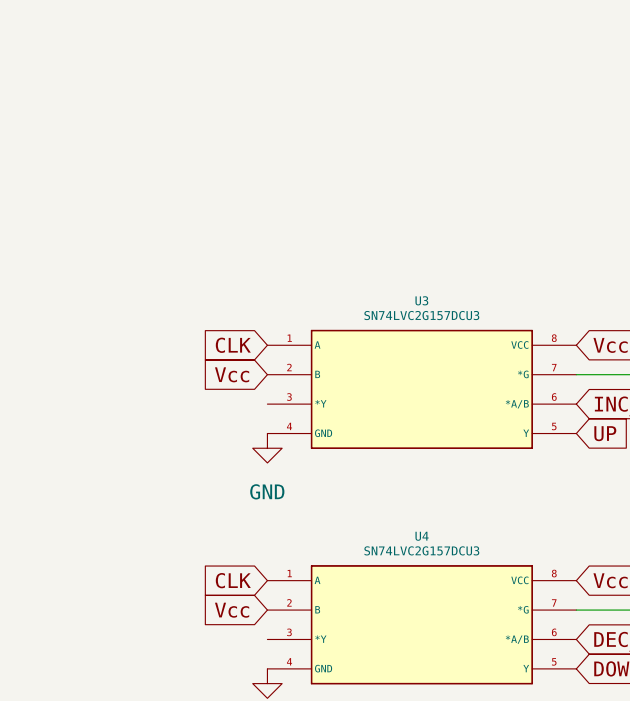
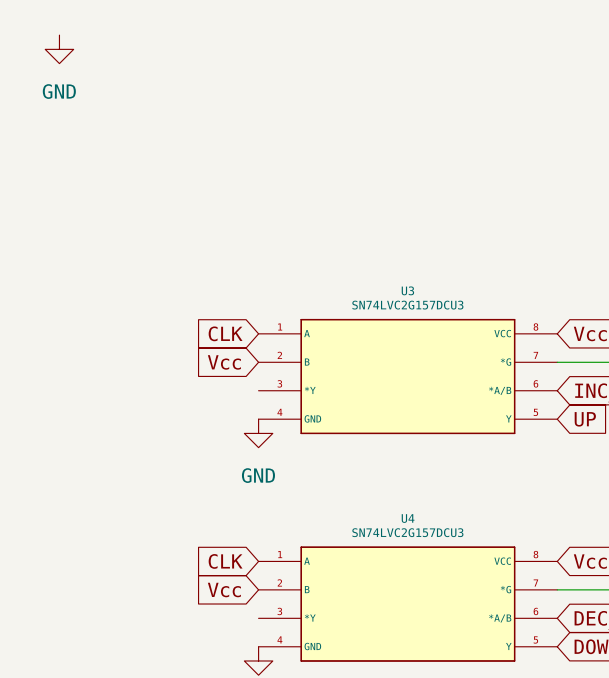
power symbol: none -> GND (59, 49)

